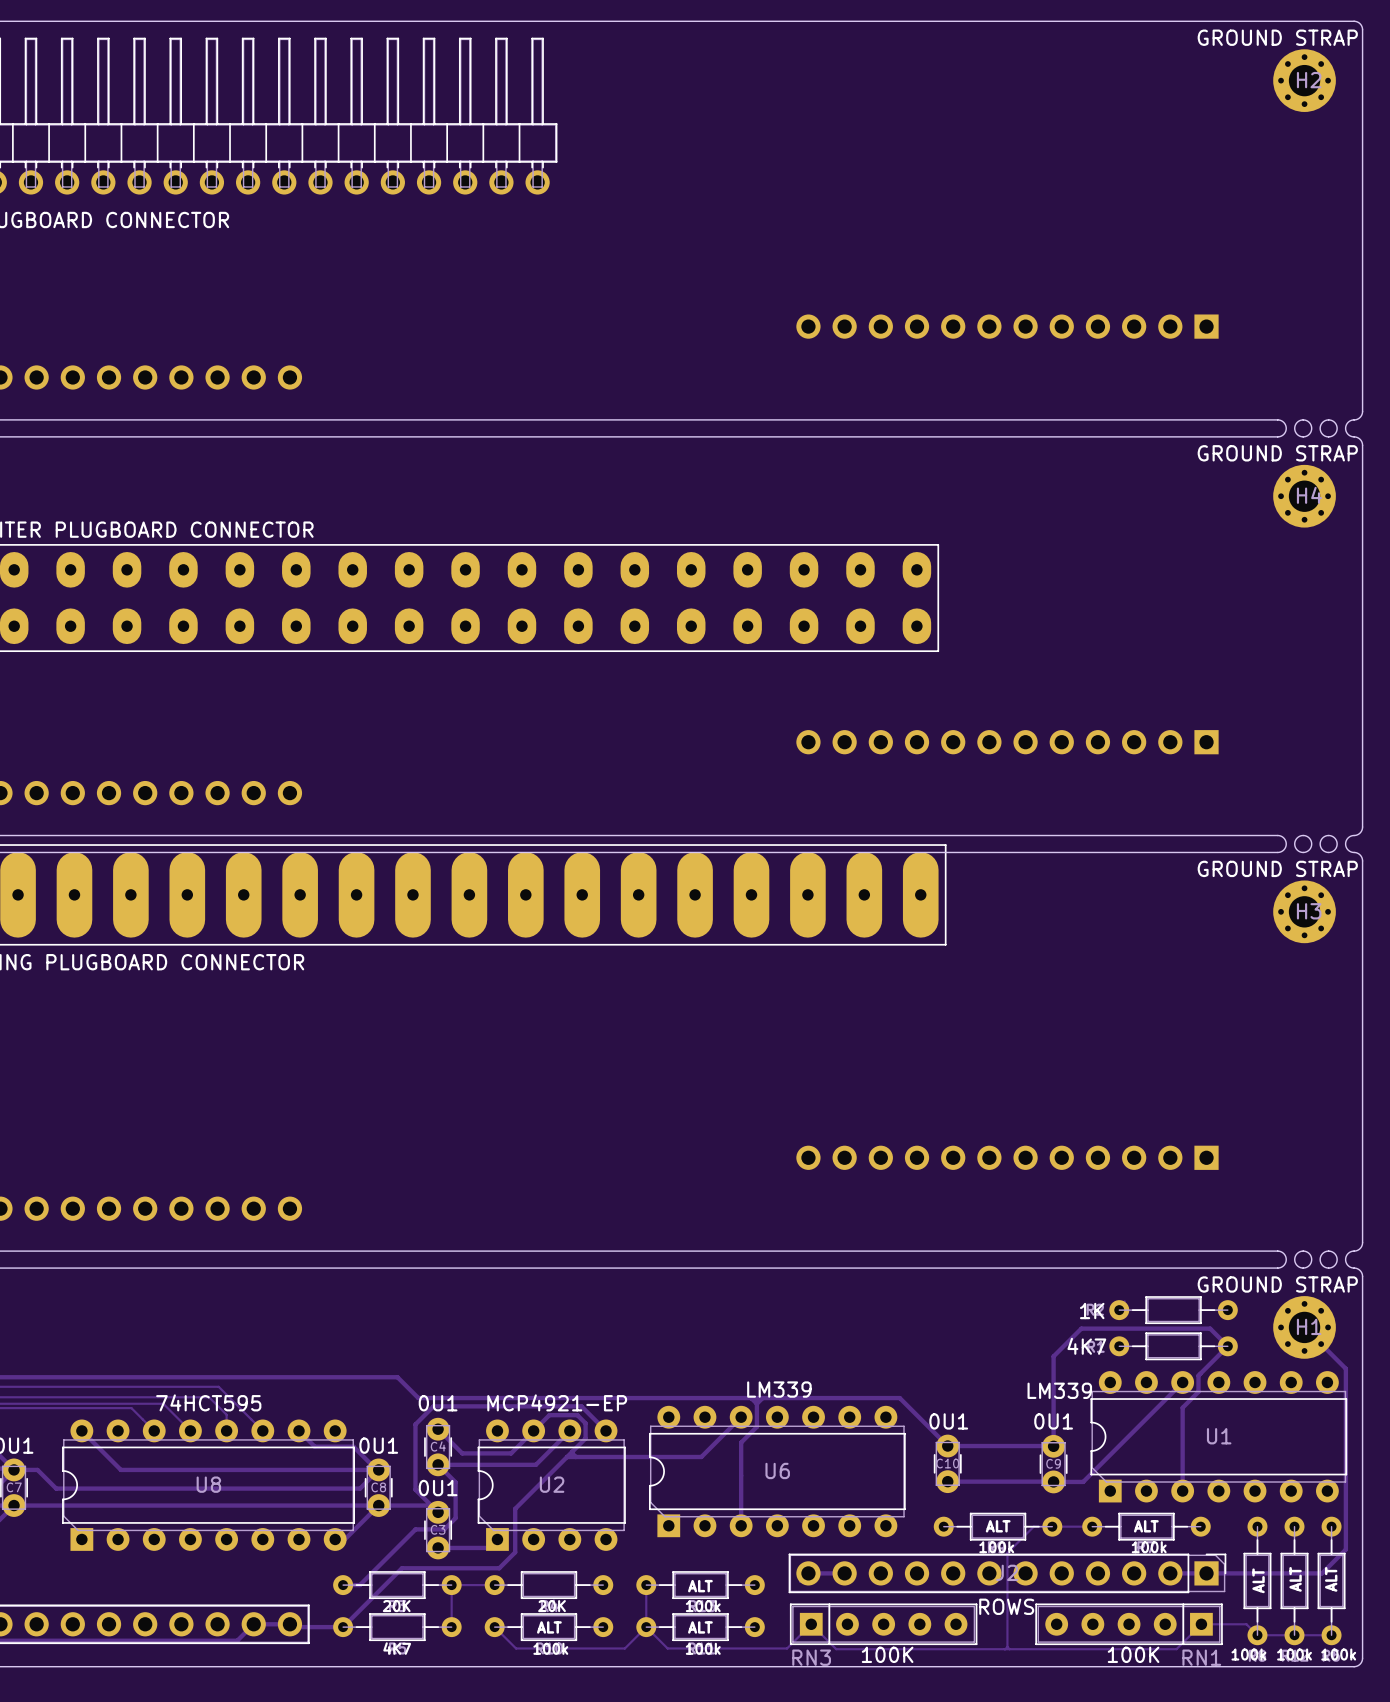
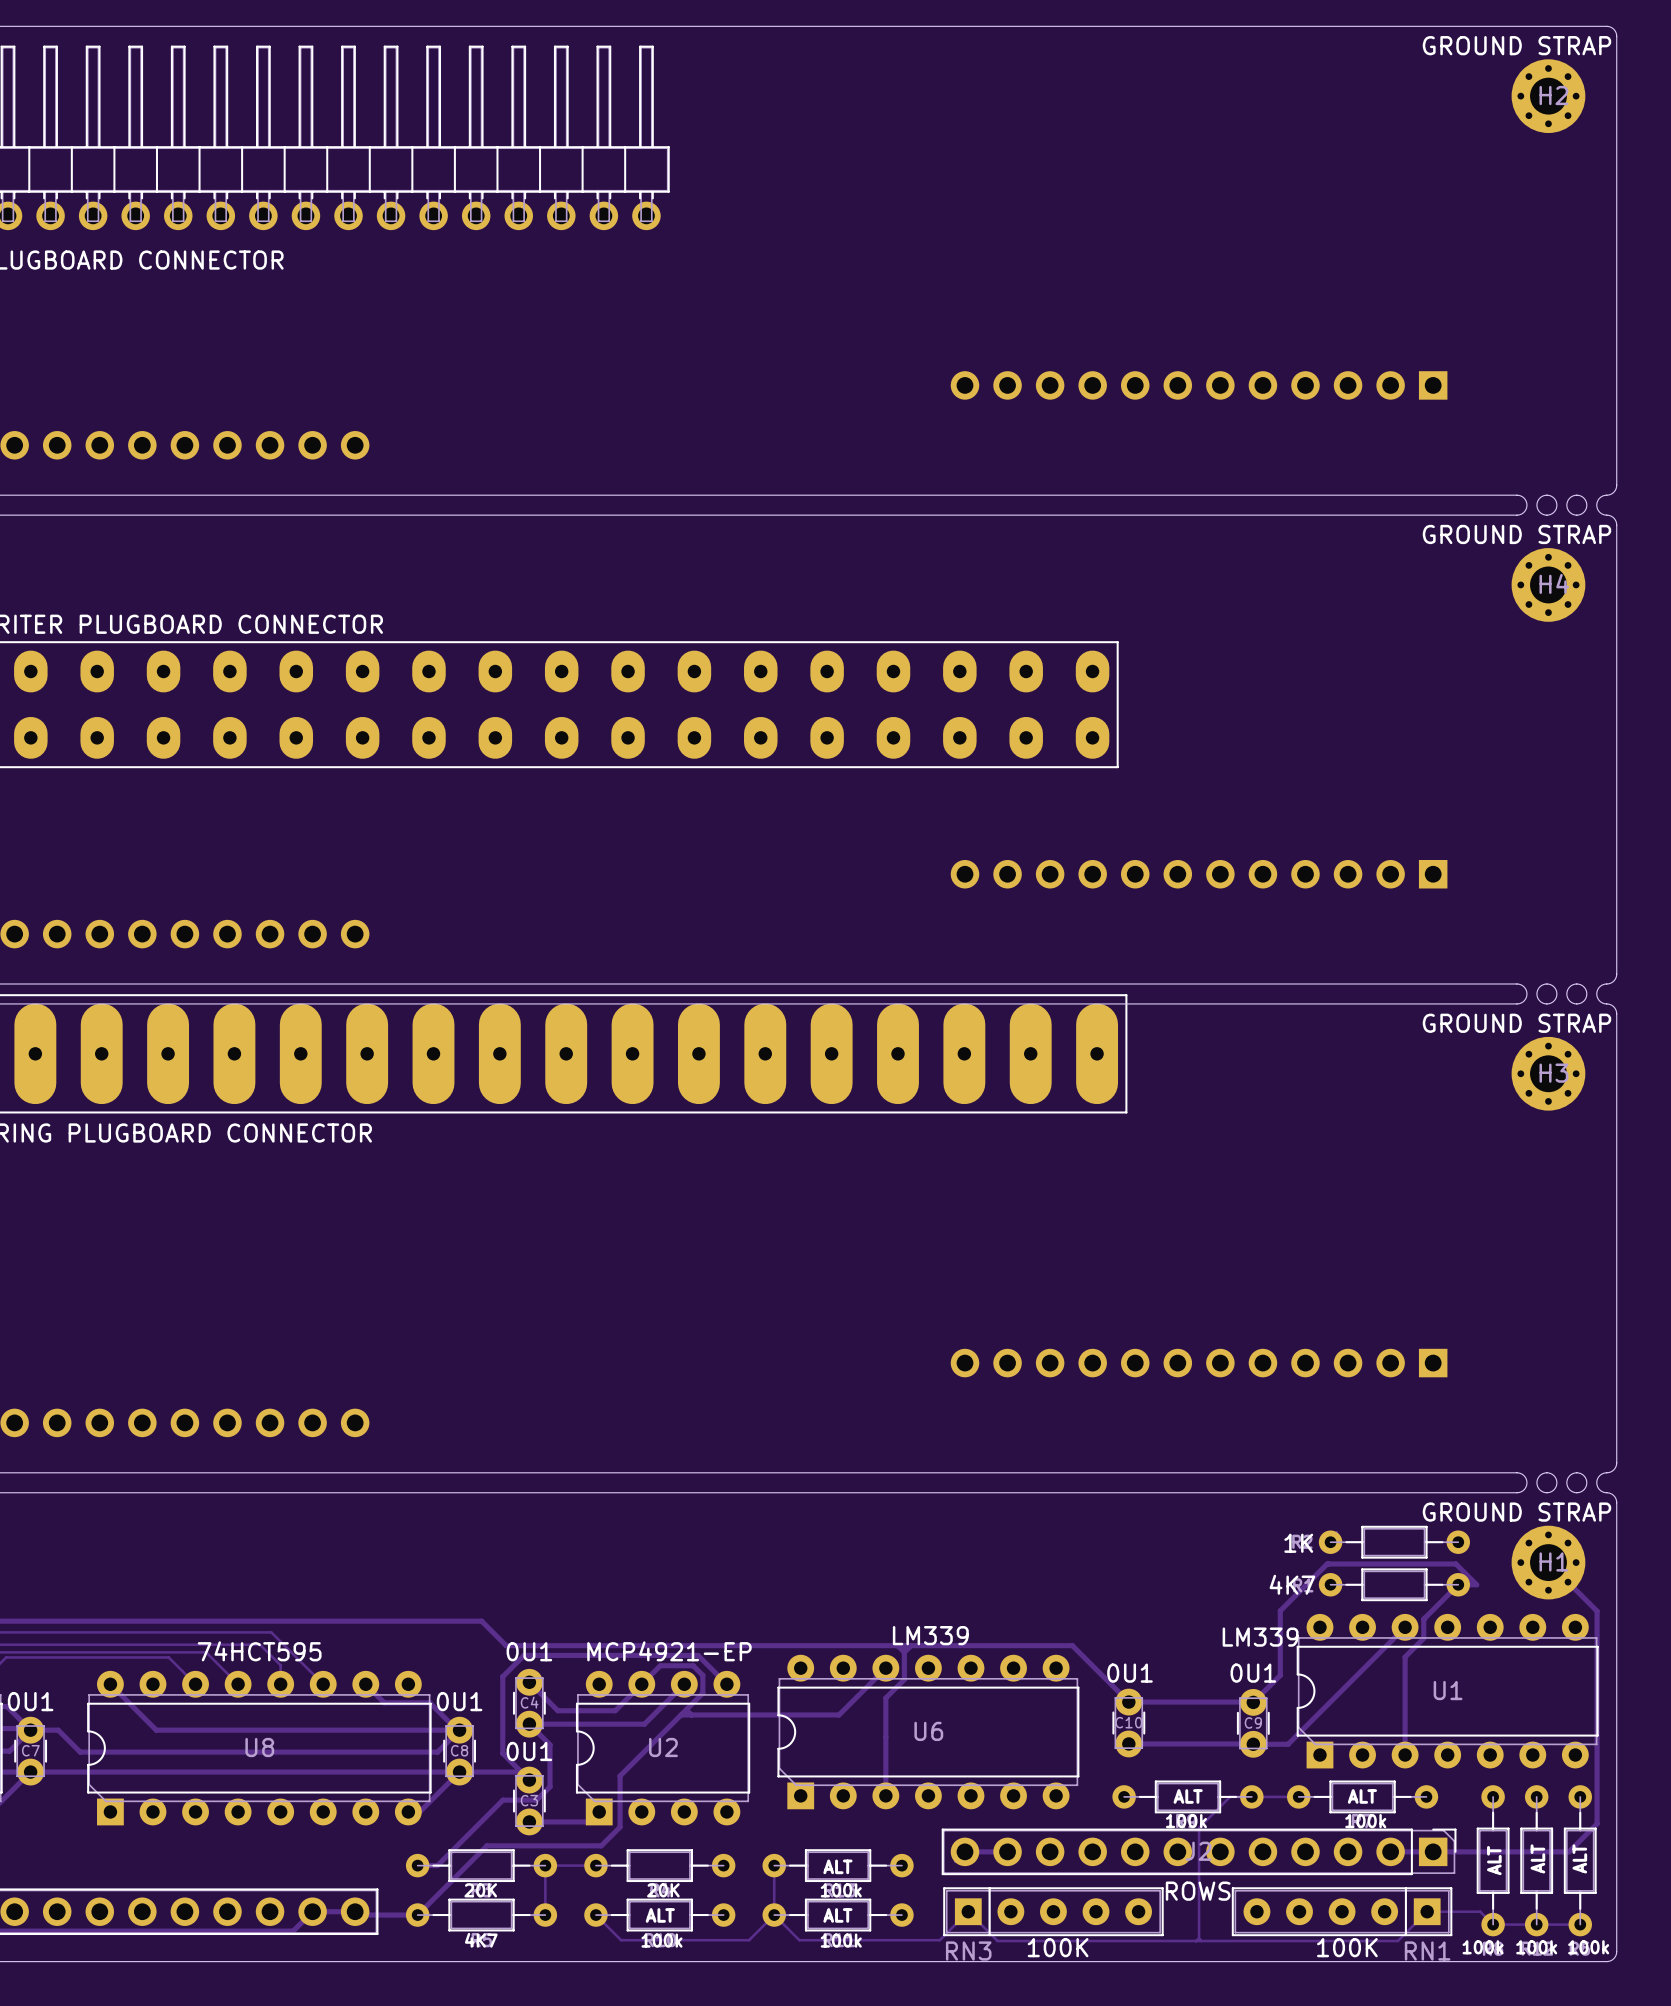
track: (1116, 1328) (1081, 1328) (1053, 1356) (1053, 1446) -> (1327, 1563) (1280, 1610) (1280, 1675) (1253, 1702)
track: (1210, 1328) (1227, 1346) -> (1437, 1563) (1455, 1563) (1476, 1584) (1458, 1584)

